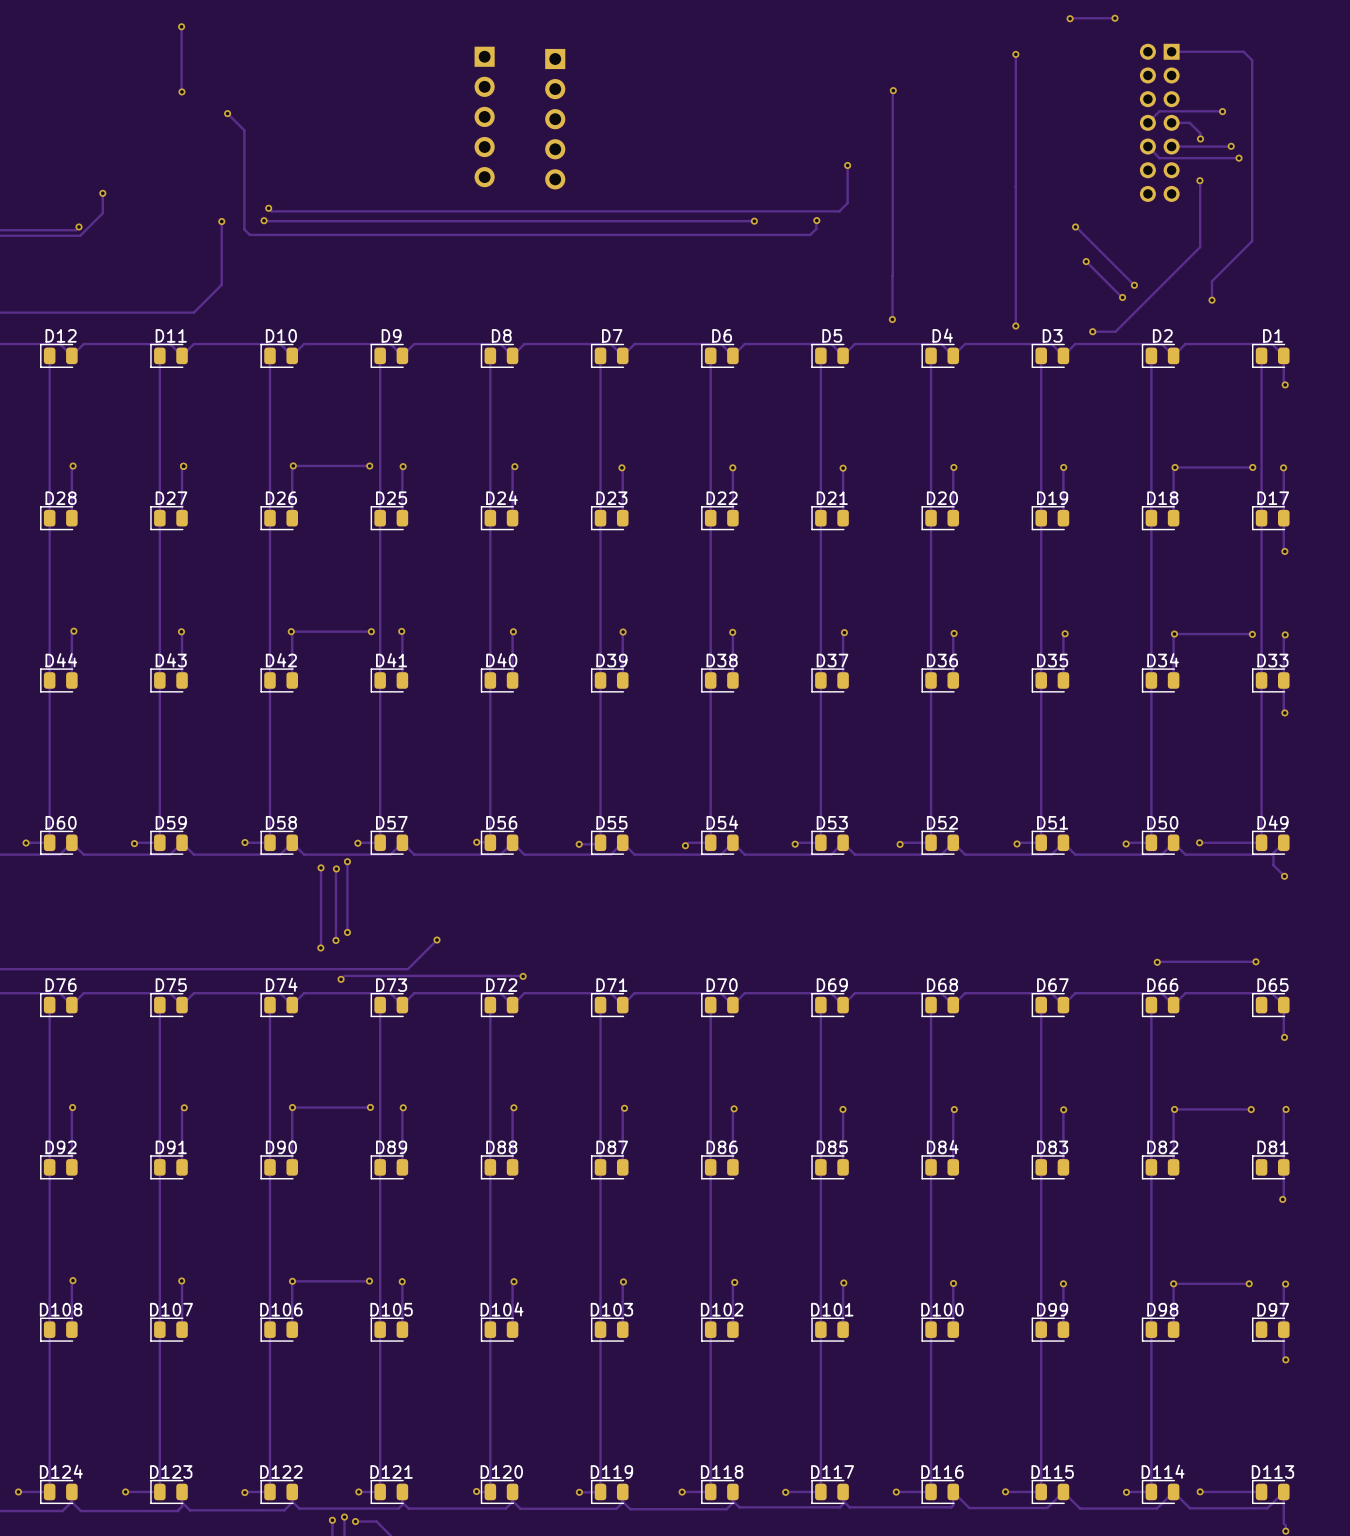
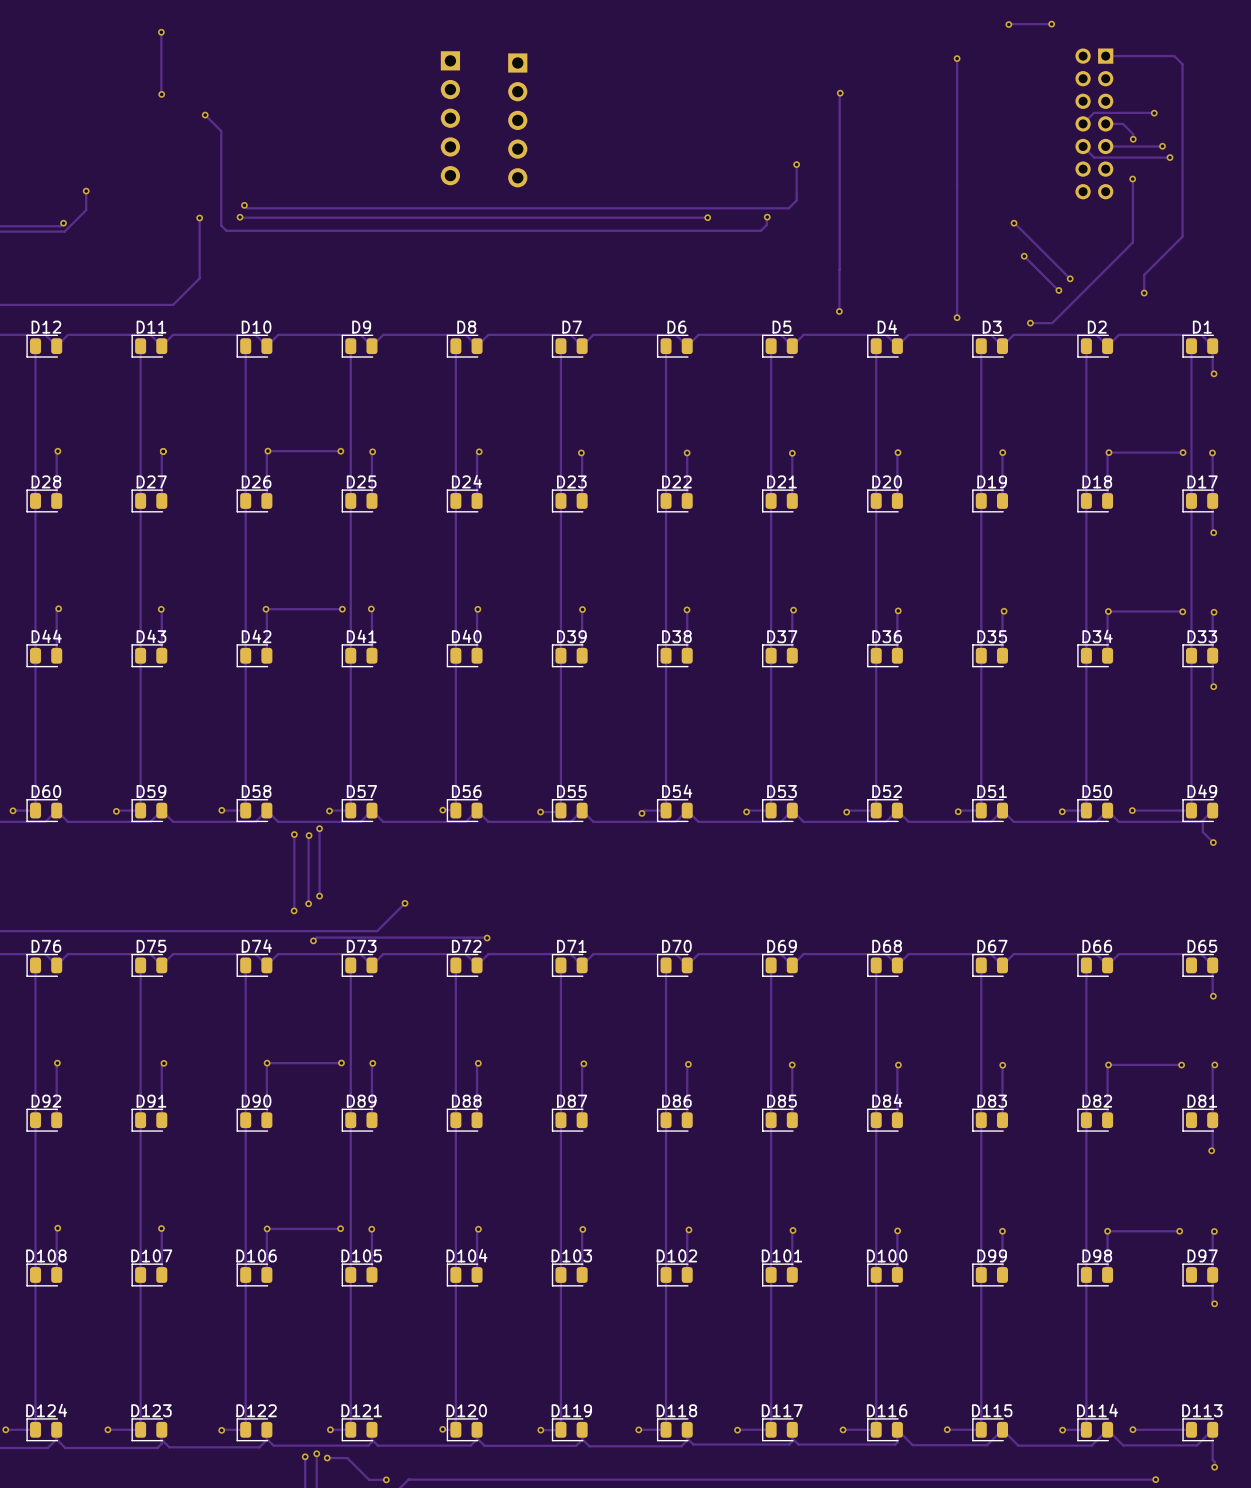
track: (1255, 961) (1157, 962) -> none
via: (1255, 961) -> none
via: (1157, 962) -> none

